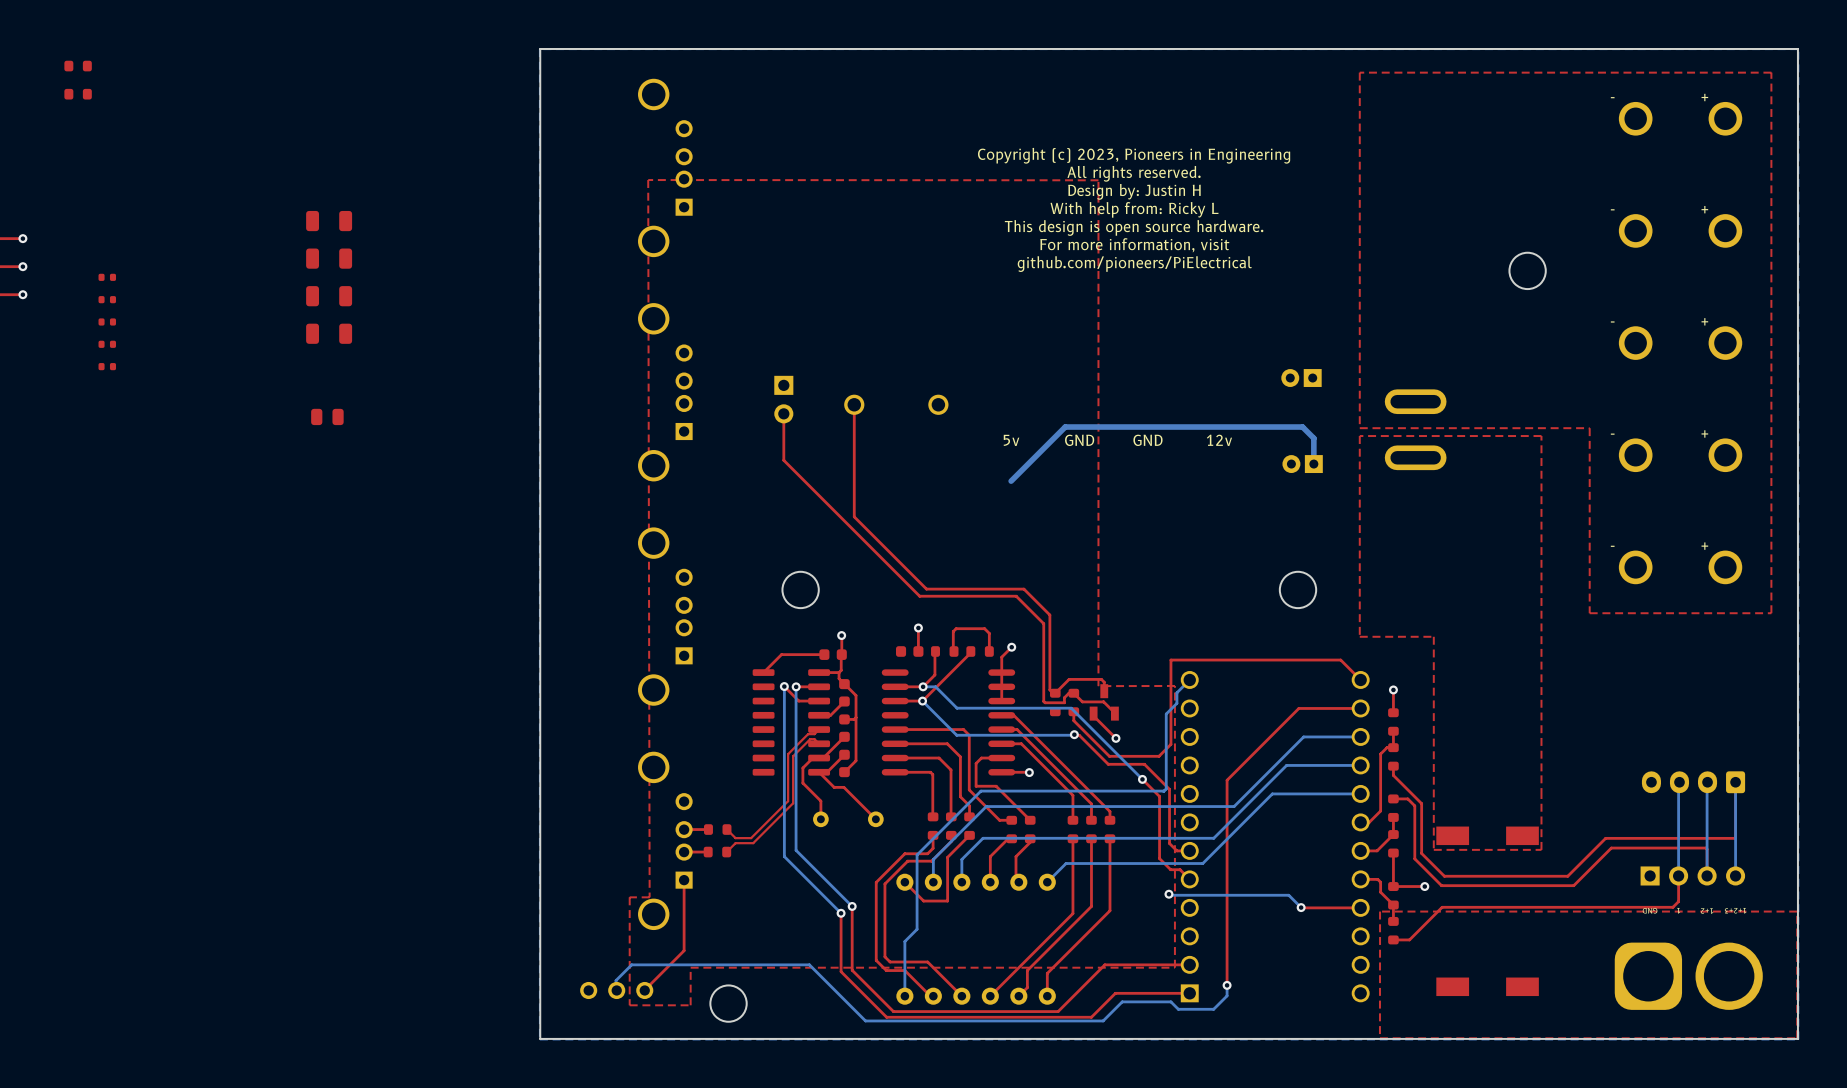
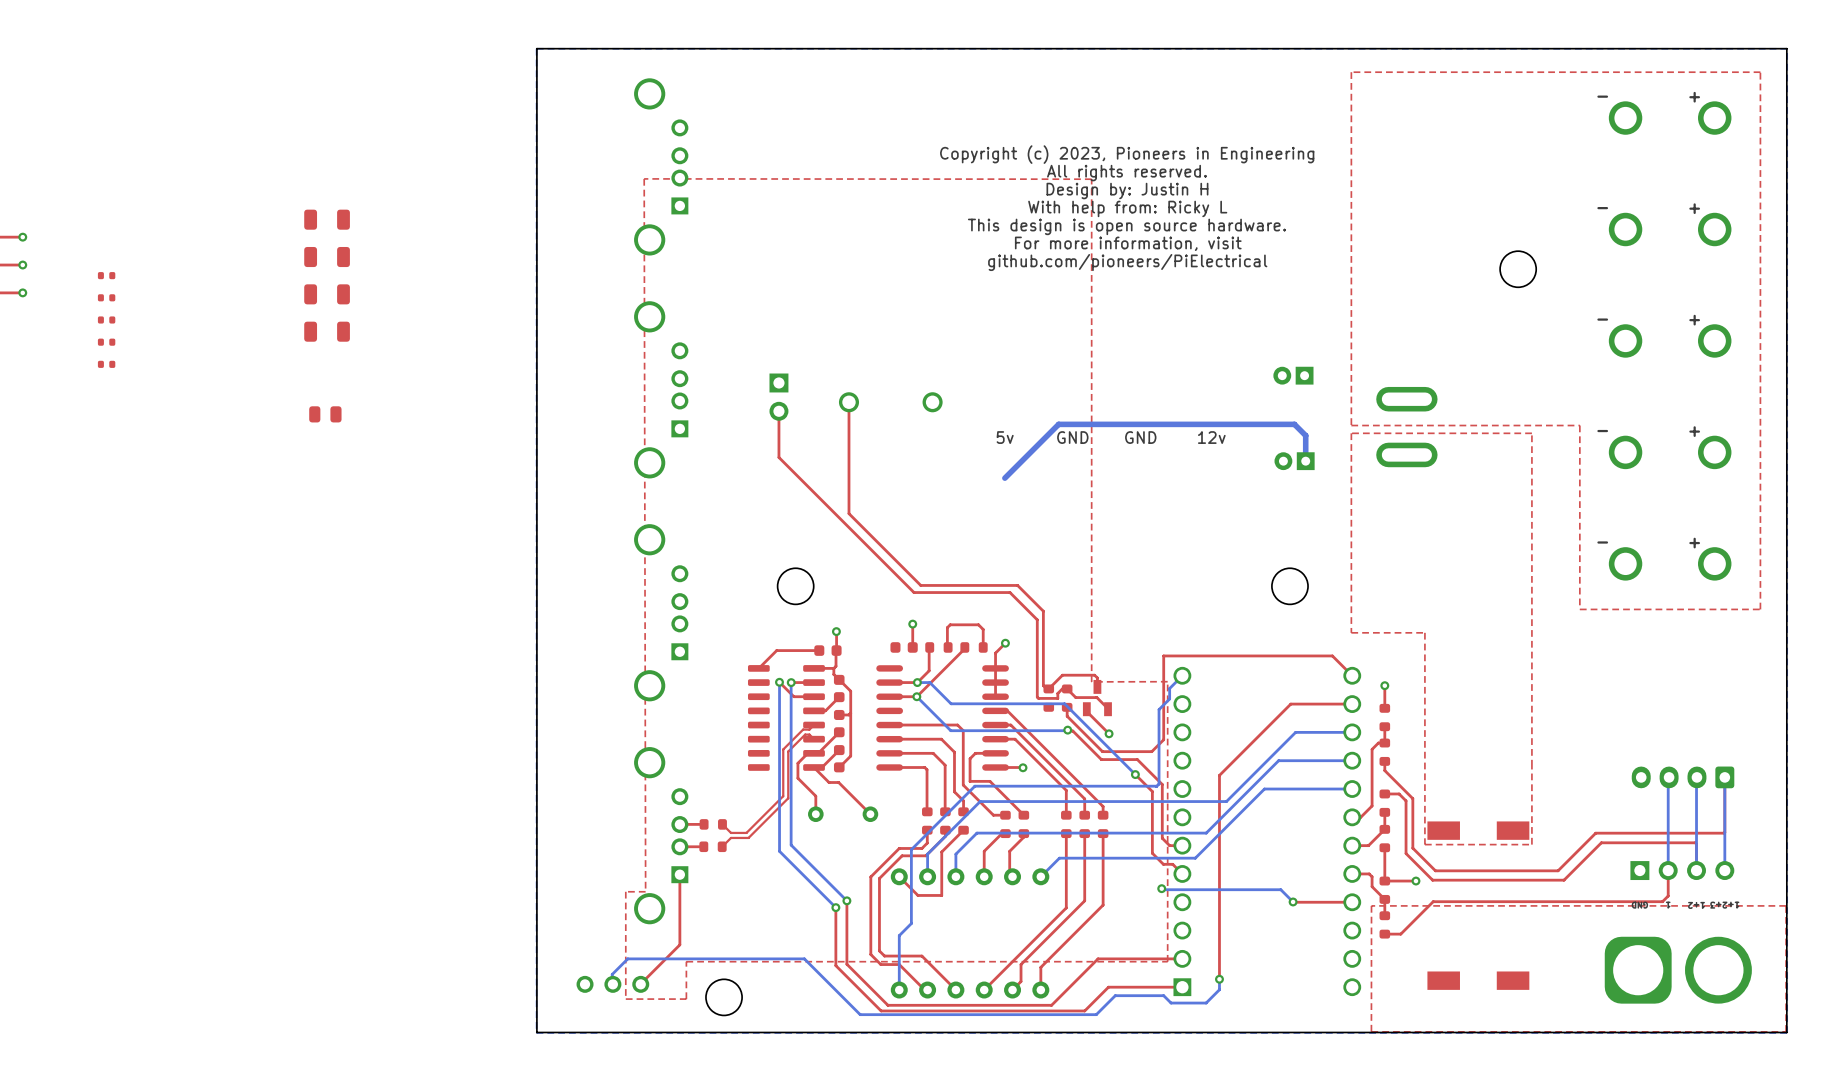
part: (78, 66) -> none
part: (78, 94) -> none

